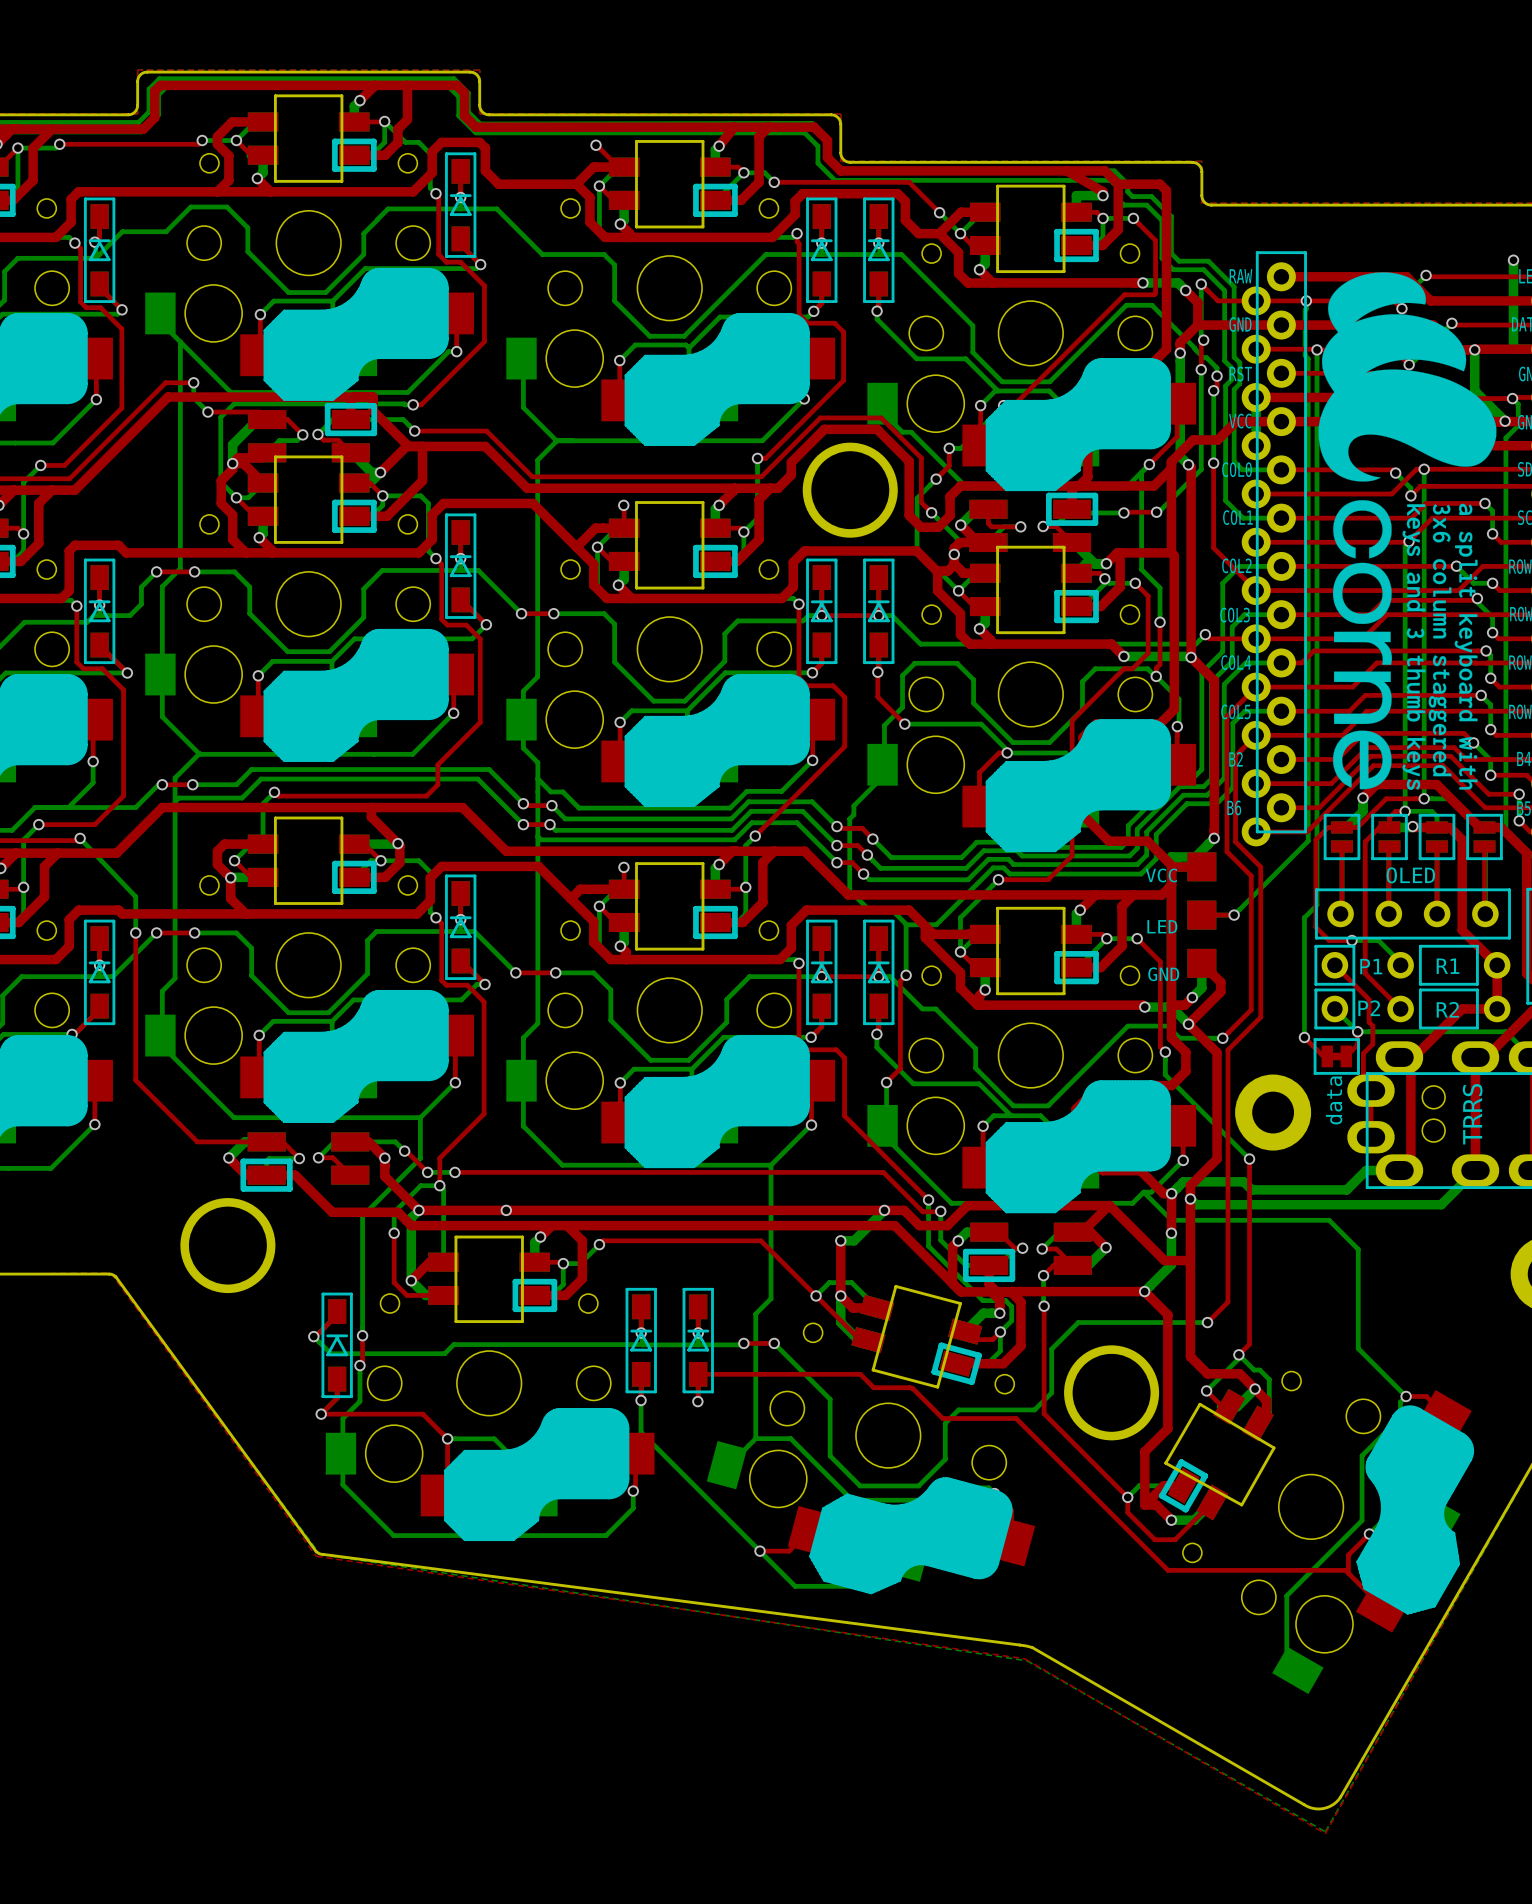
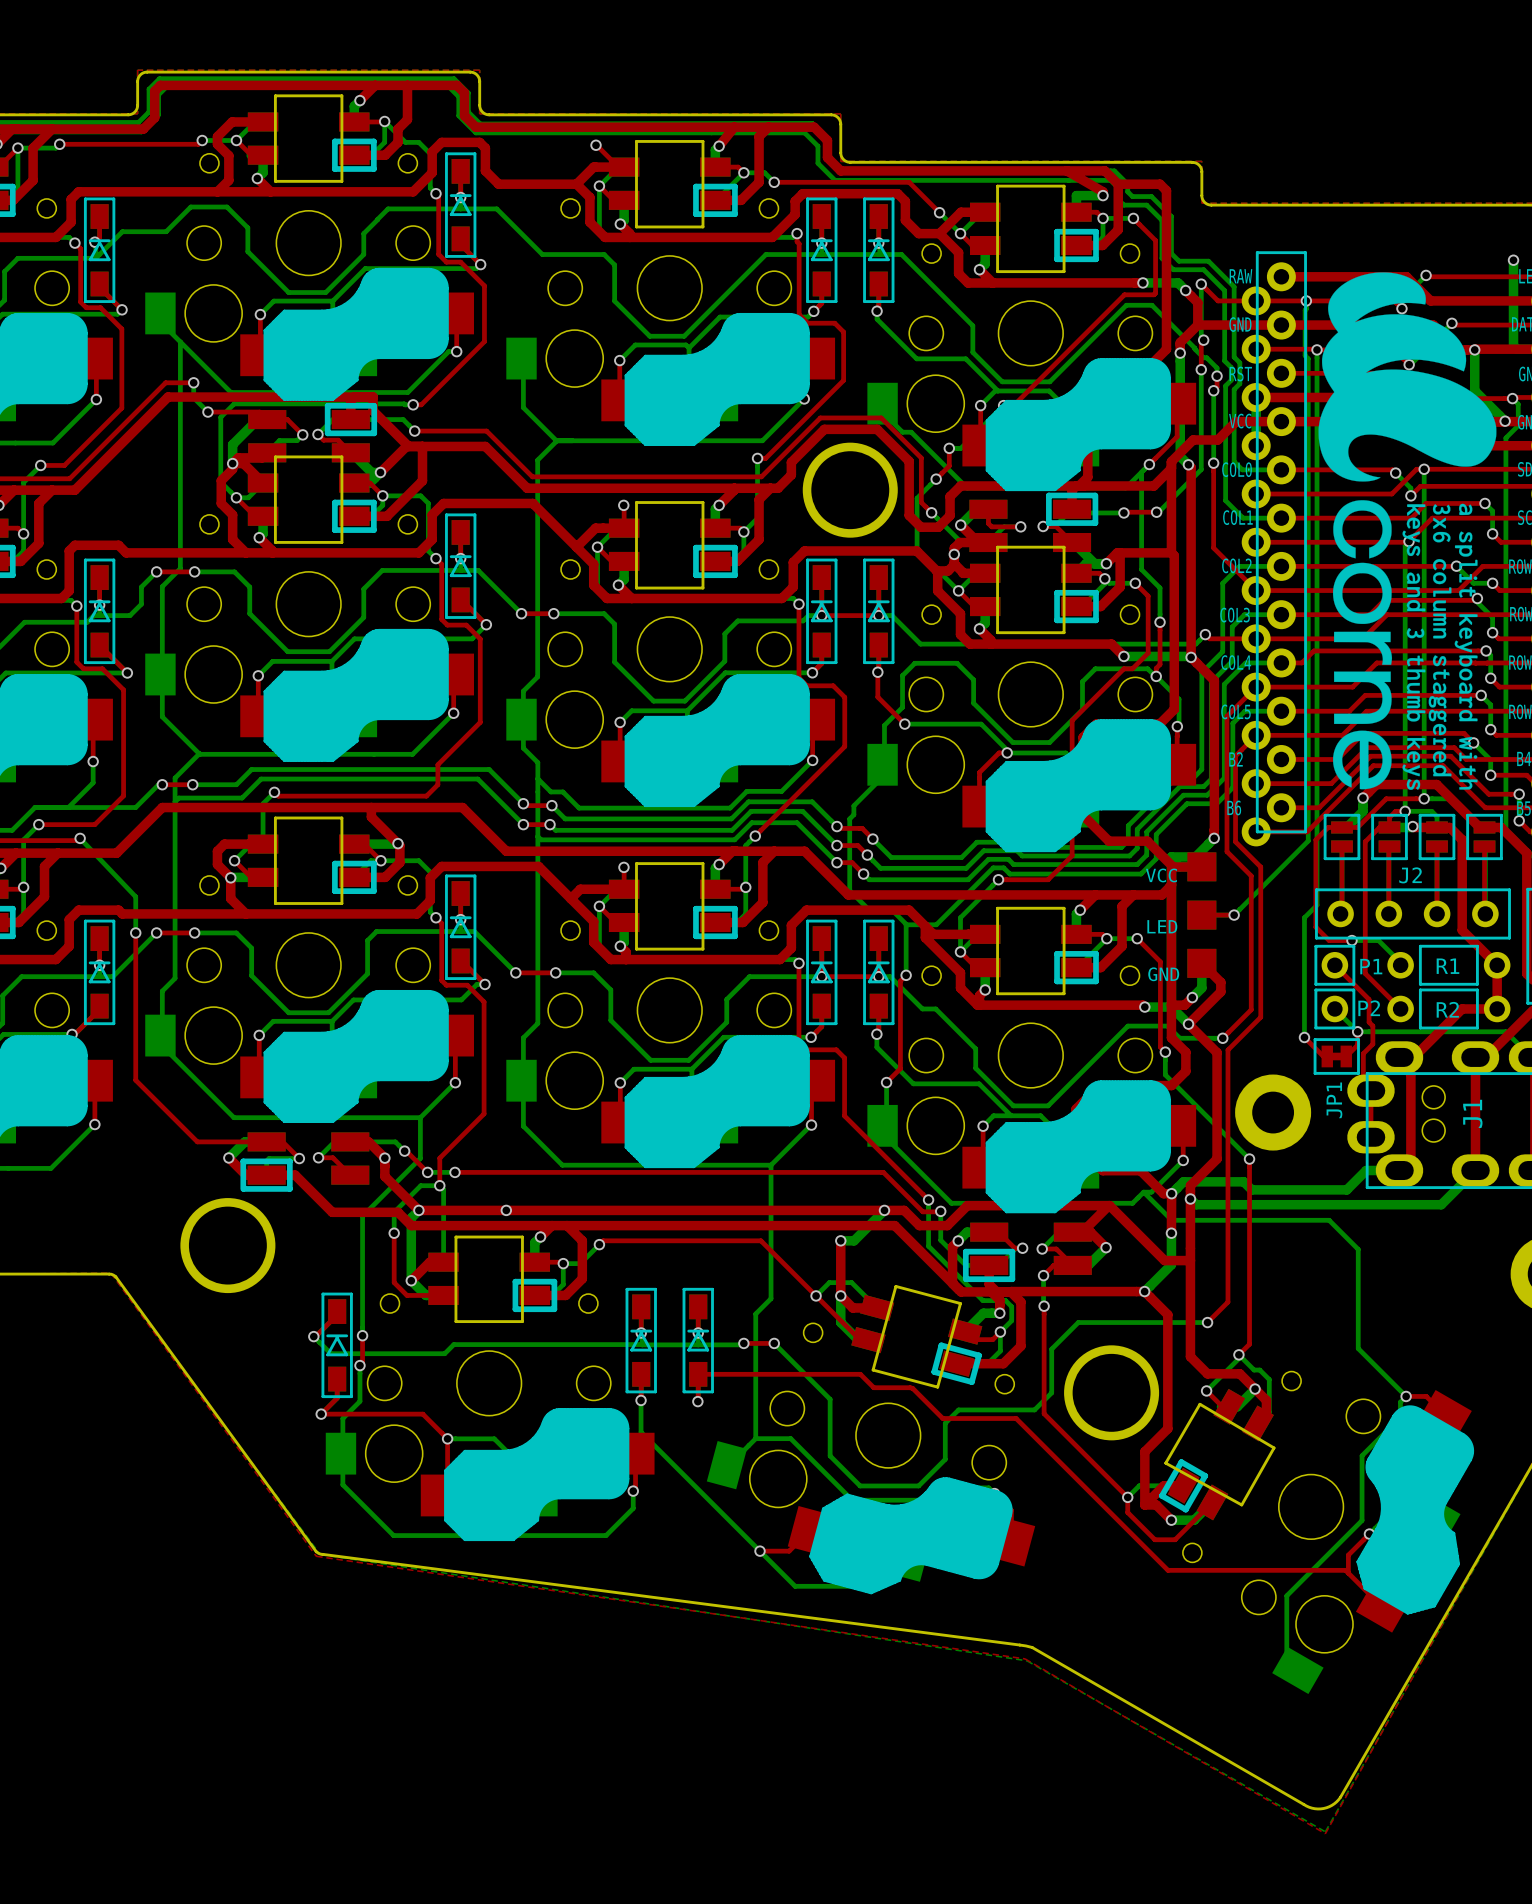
OLED name: OLED (1410, 875) -> J2 (1410, 875)
data name: data (1334, 1100) -> JP1 (1334, 1100)
TRRS name: TRRS (1472, 1114) -> J1 (1472, 1113)

